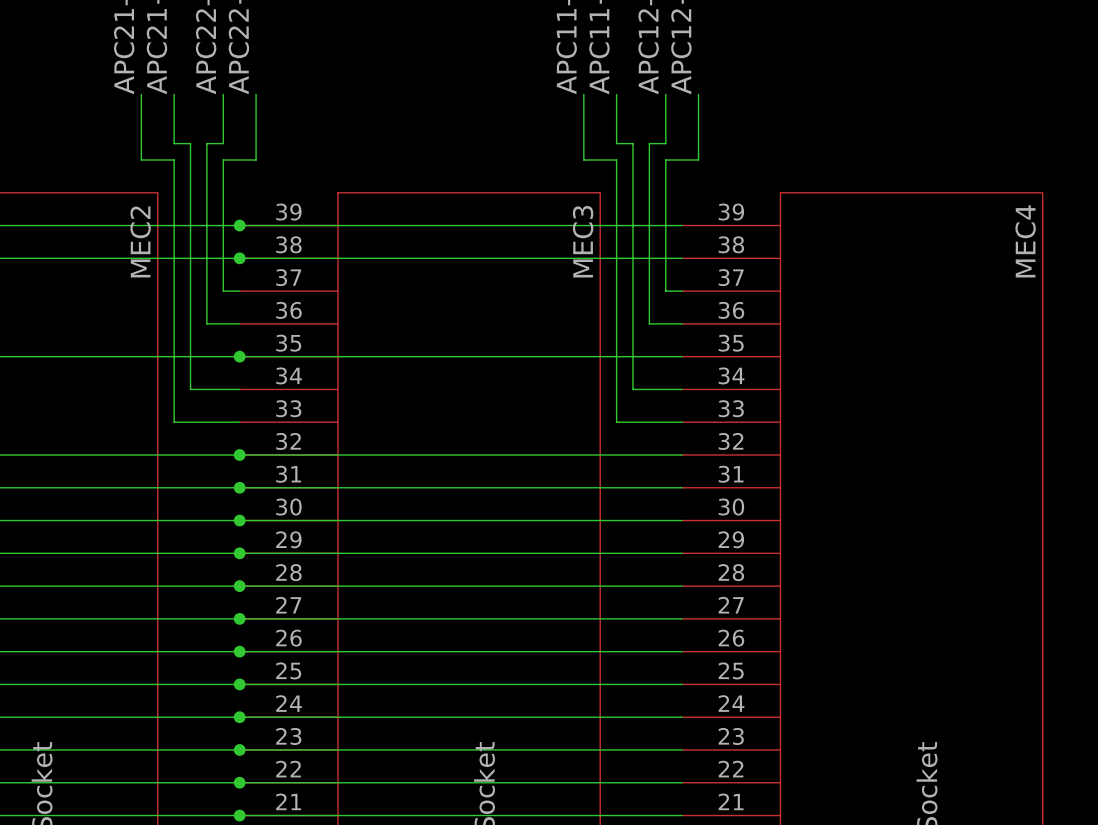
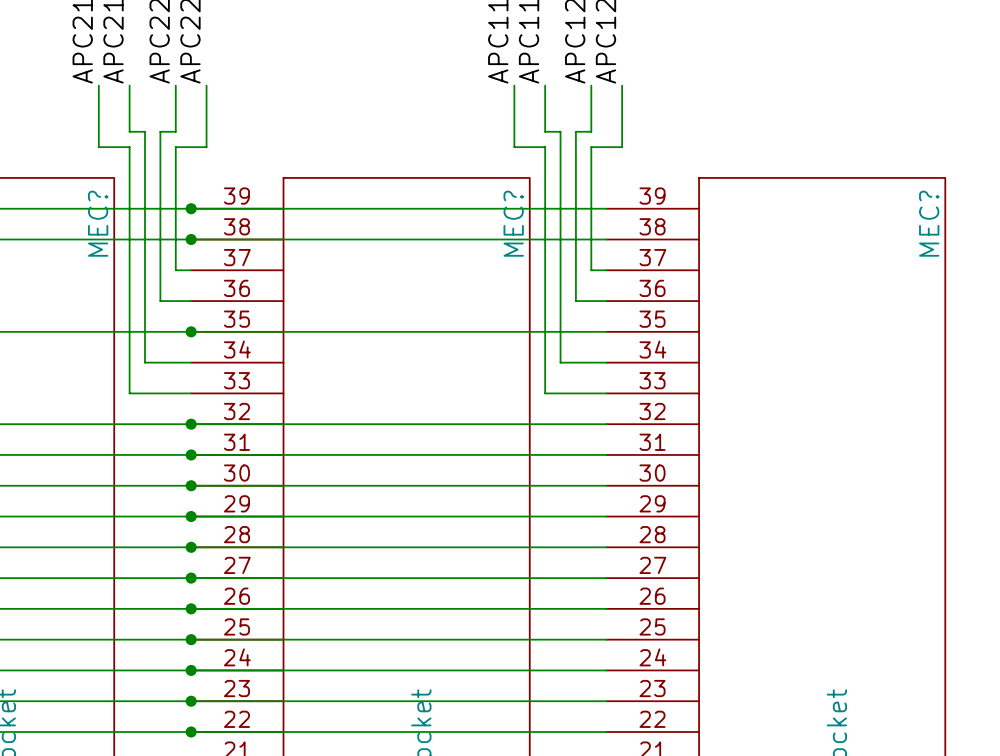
MEC2 name: MEC2 (140, 241) -> MEC? (98, 223)
MEC3 name: MEC3 (583, 241) -> MEC? (513, 223)
MEC4 name: MEC4 (1025, 241) -> MEC? (929, 223)

